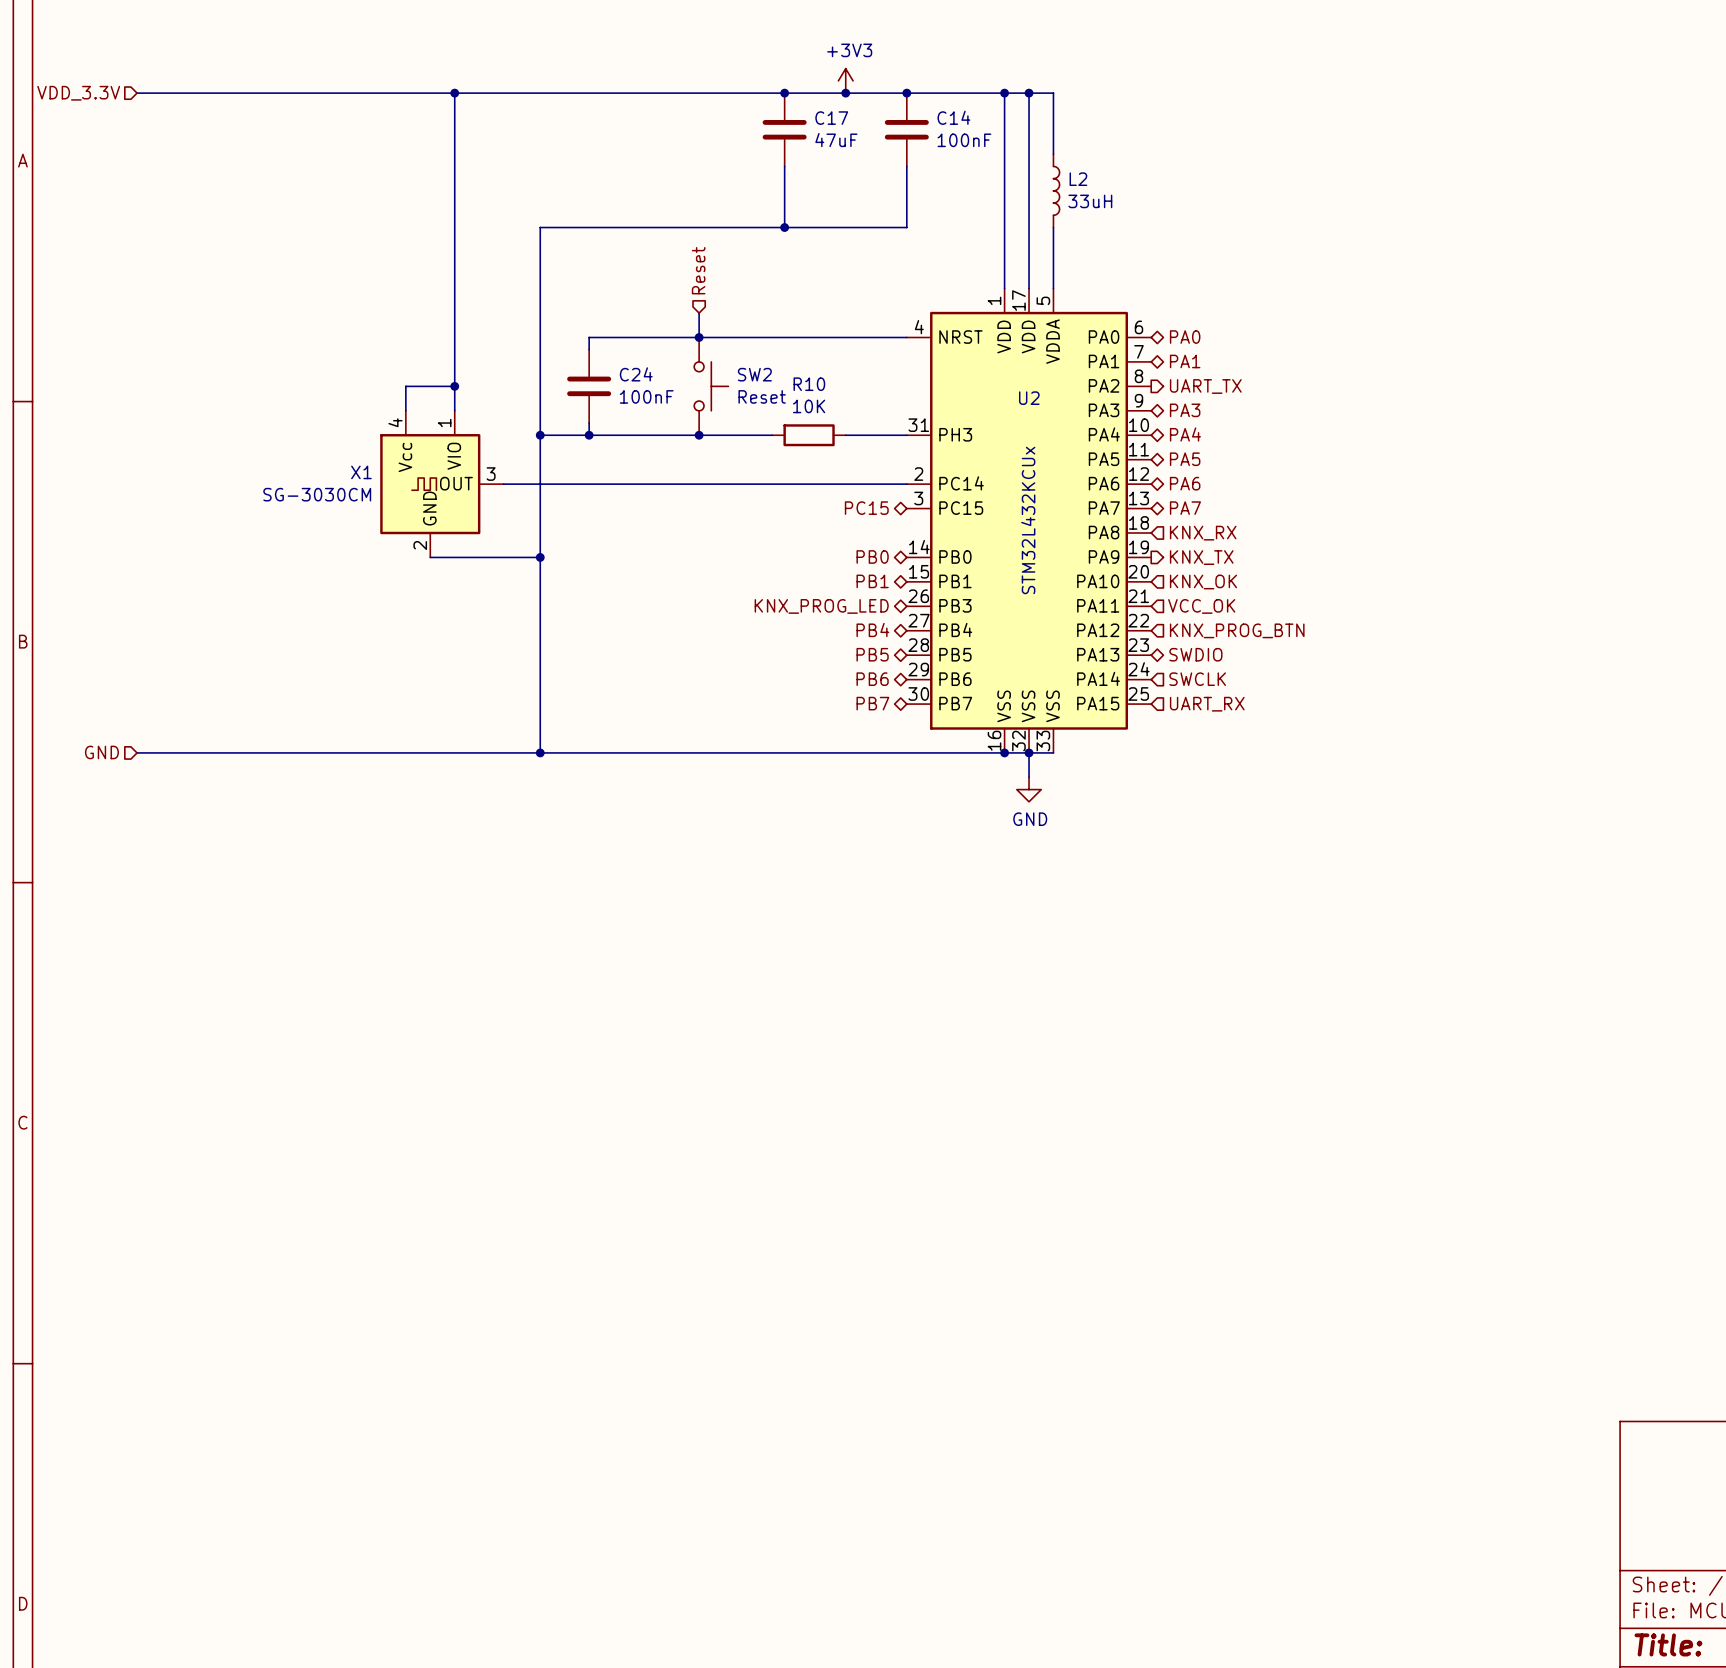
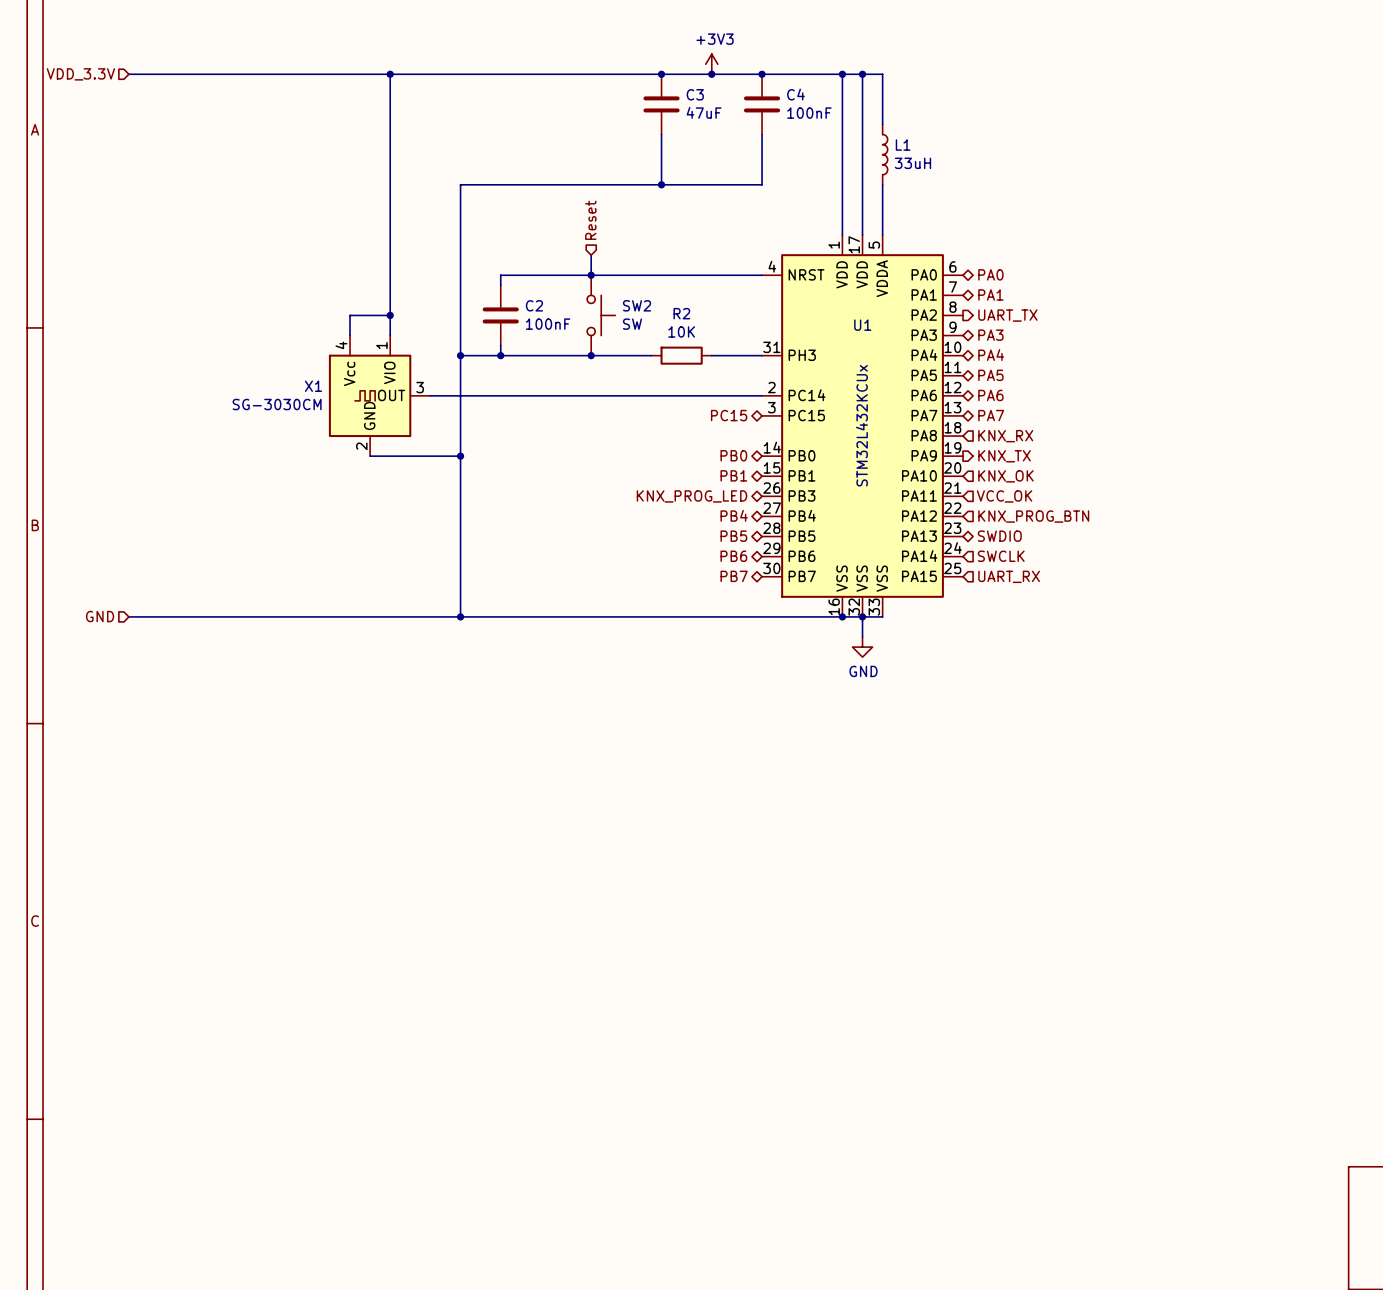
C14 name: C14 (953, 117) -> C4 (795, 94)
C17 name: C17 (831, 118) -> C3 (695, 94)
L2 name: L2 (1078, 179) -> L1 (903, 145)
C24 name: C24 (636, 374) -> C2 (534, 305)
R10 name: R10 (809, 384) -> R2 (681, 313)
SW2 value: Reset (762, 396) -> SW (632, 324)
U2 name: U2 (1029, 398) -> U1 (862, 325)

